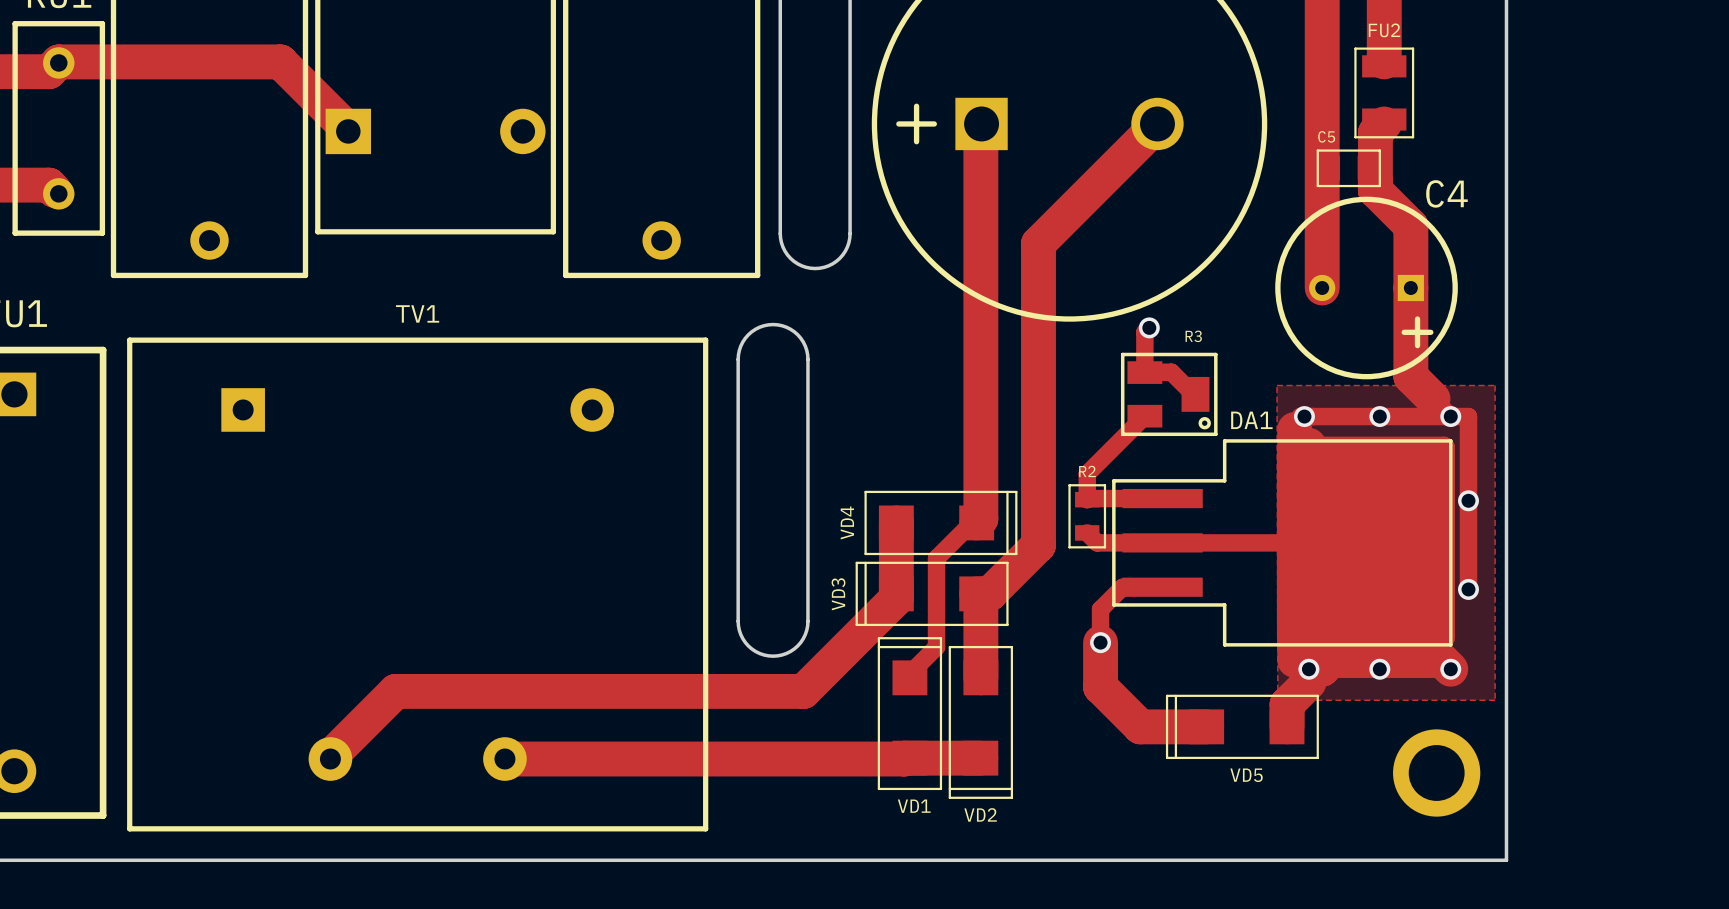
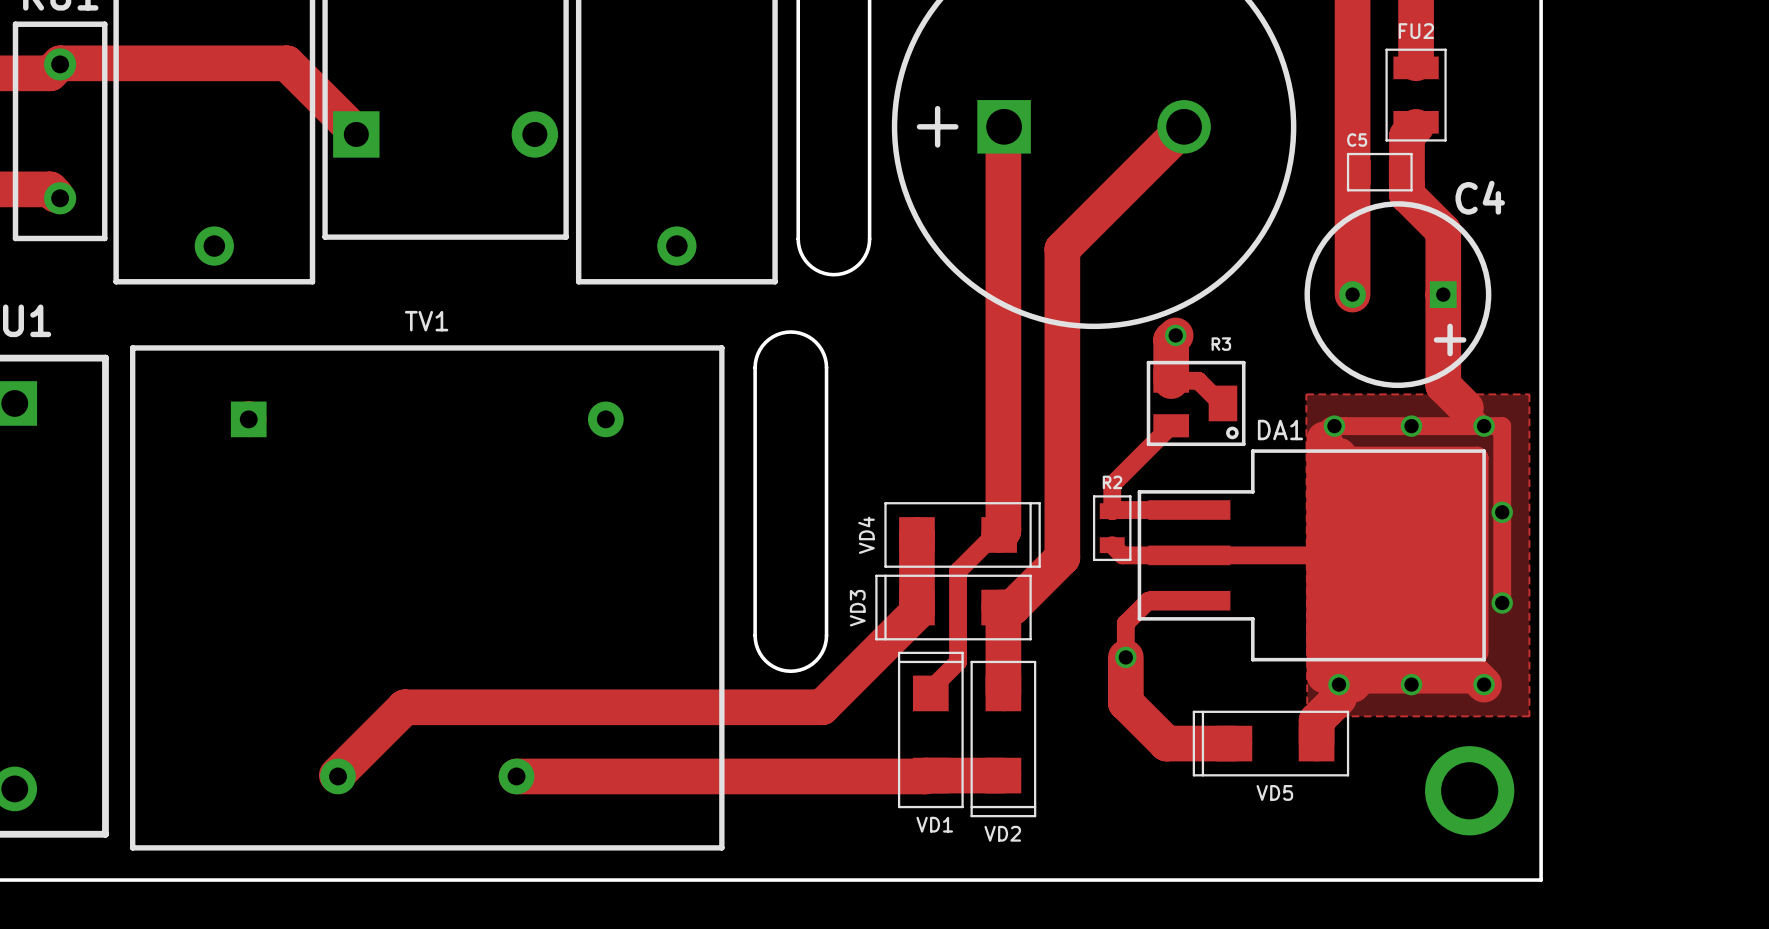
track width: thin (1149, 327) (1144, 332) (1144, 372) -> thick (1175, 335) (1171, 339) (1171, 381)
TV1 footprint: [127, 337, 709, 832] -> [130, 345, 725, 851]

